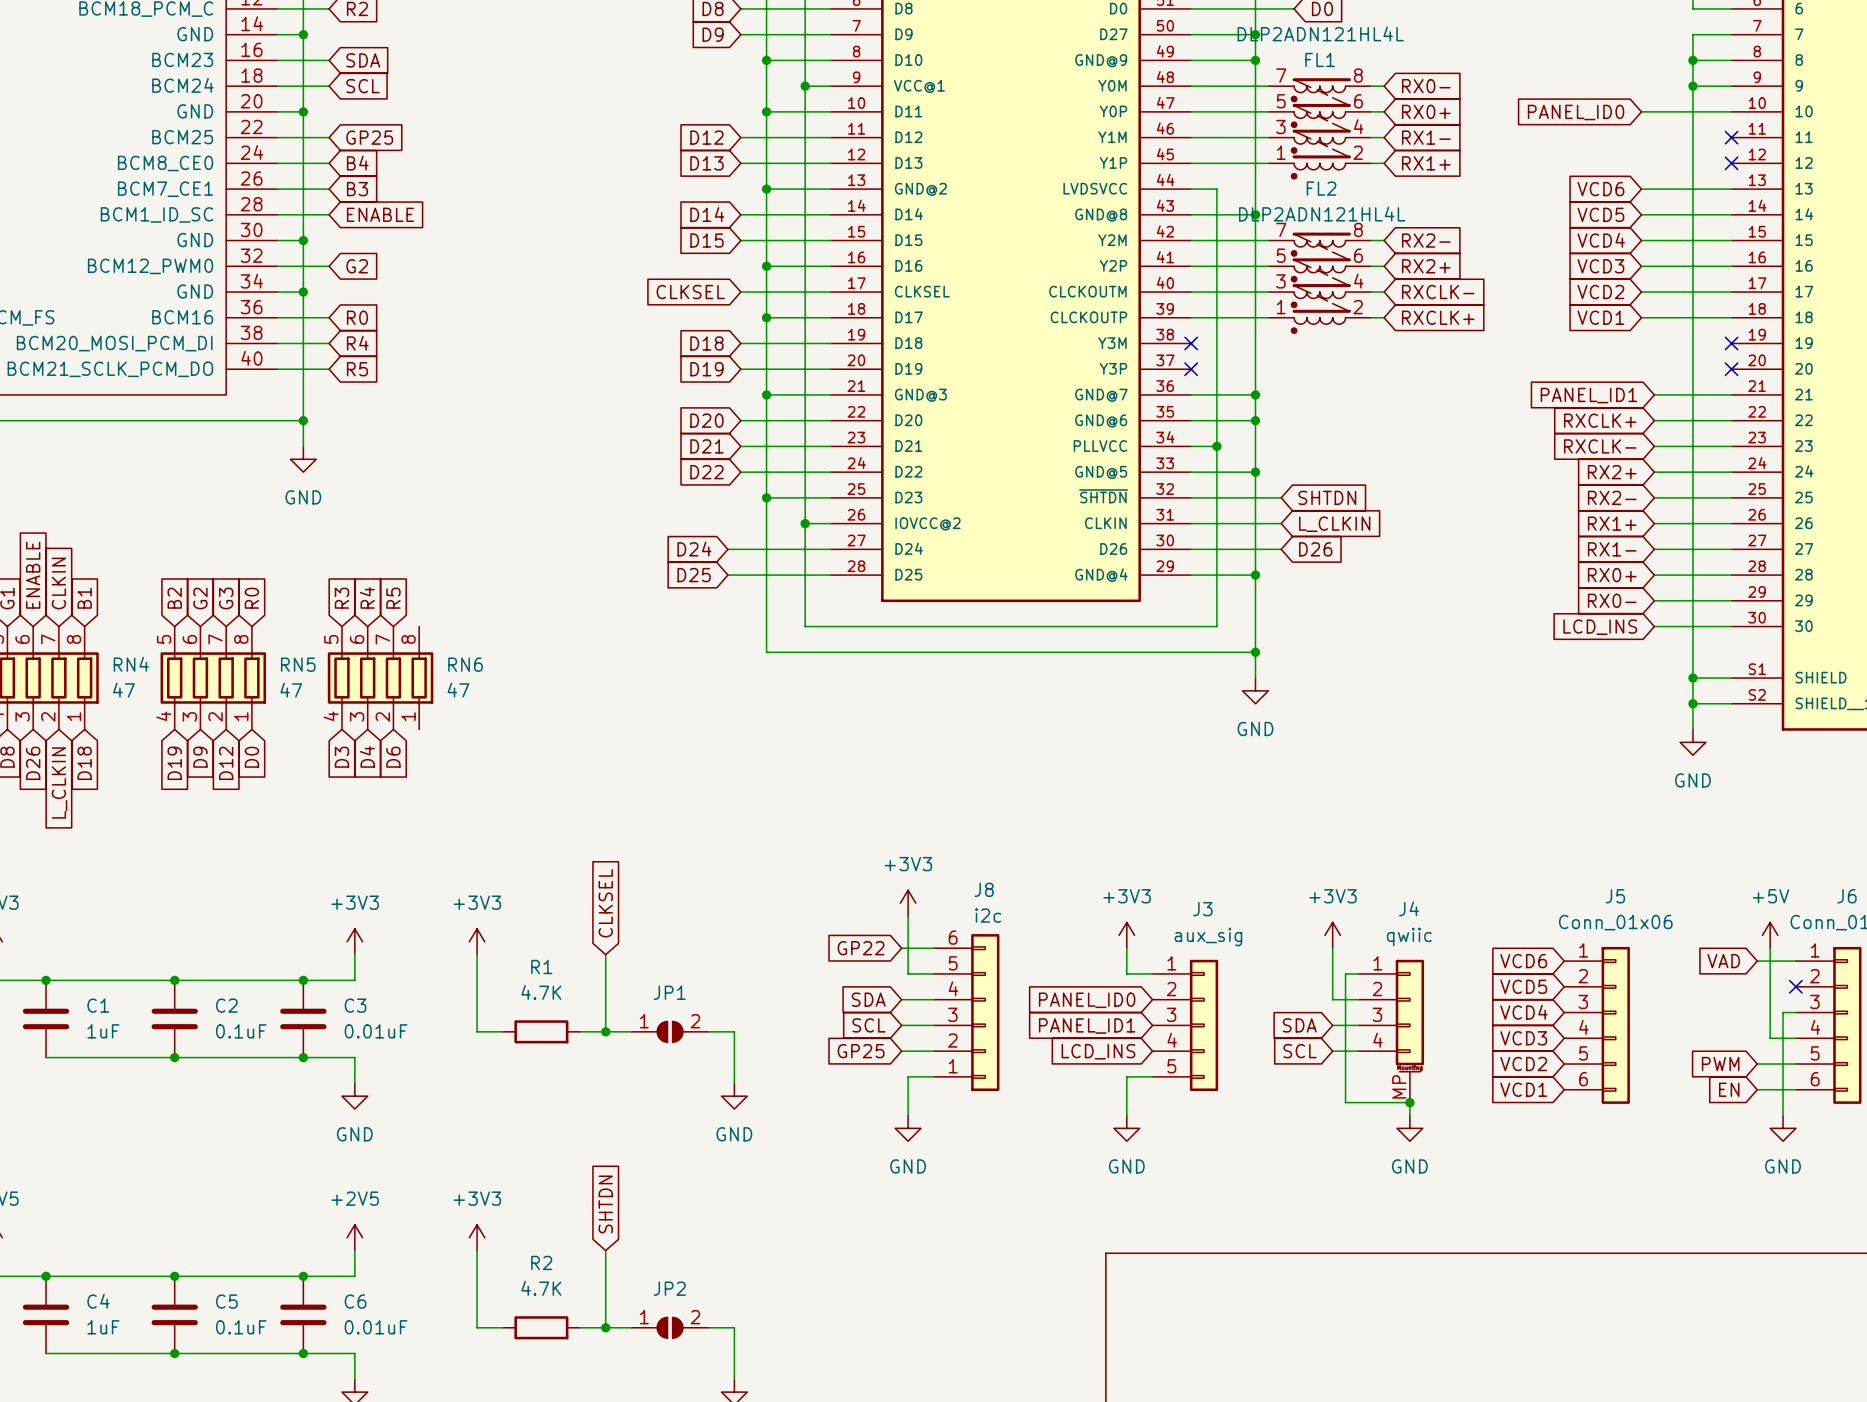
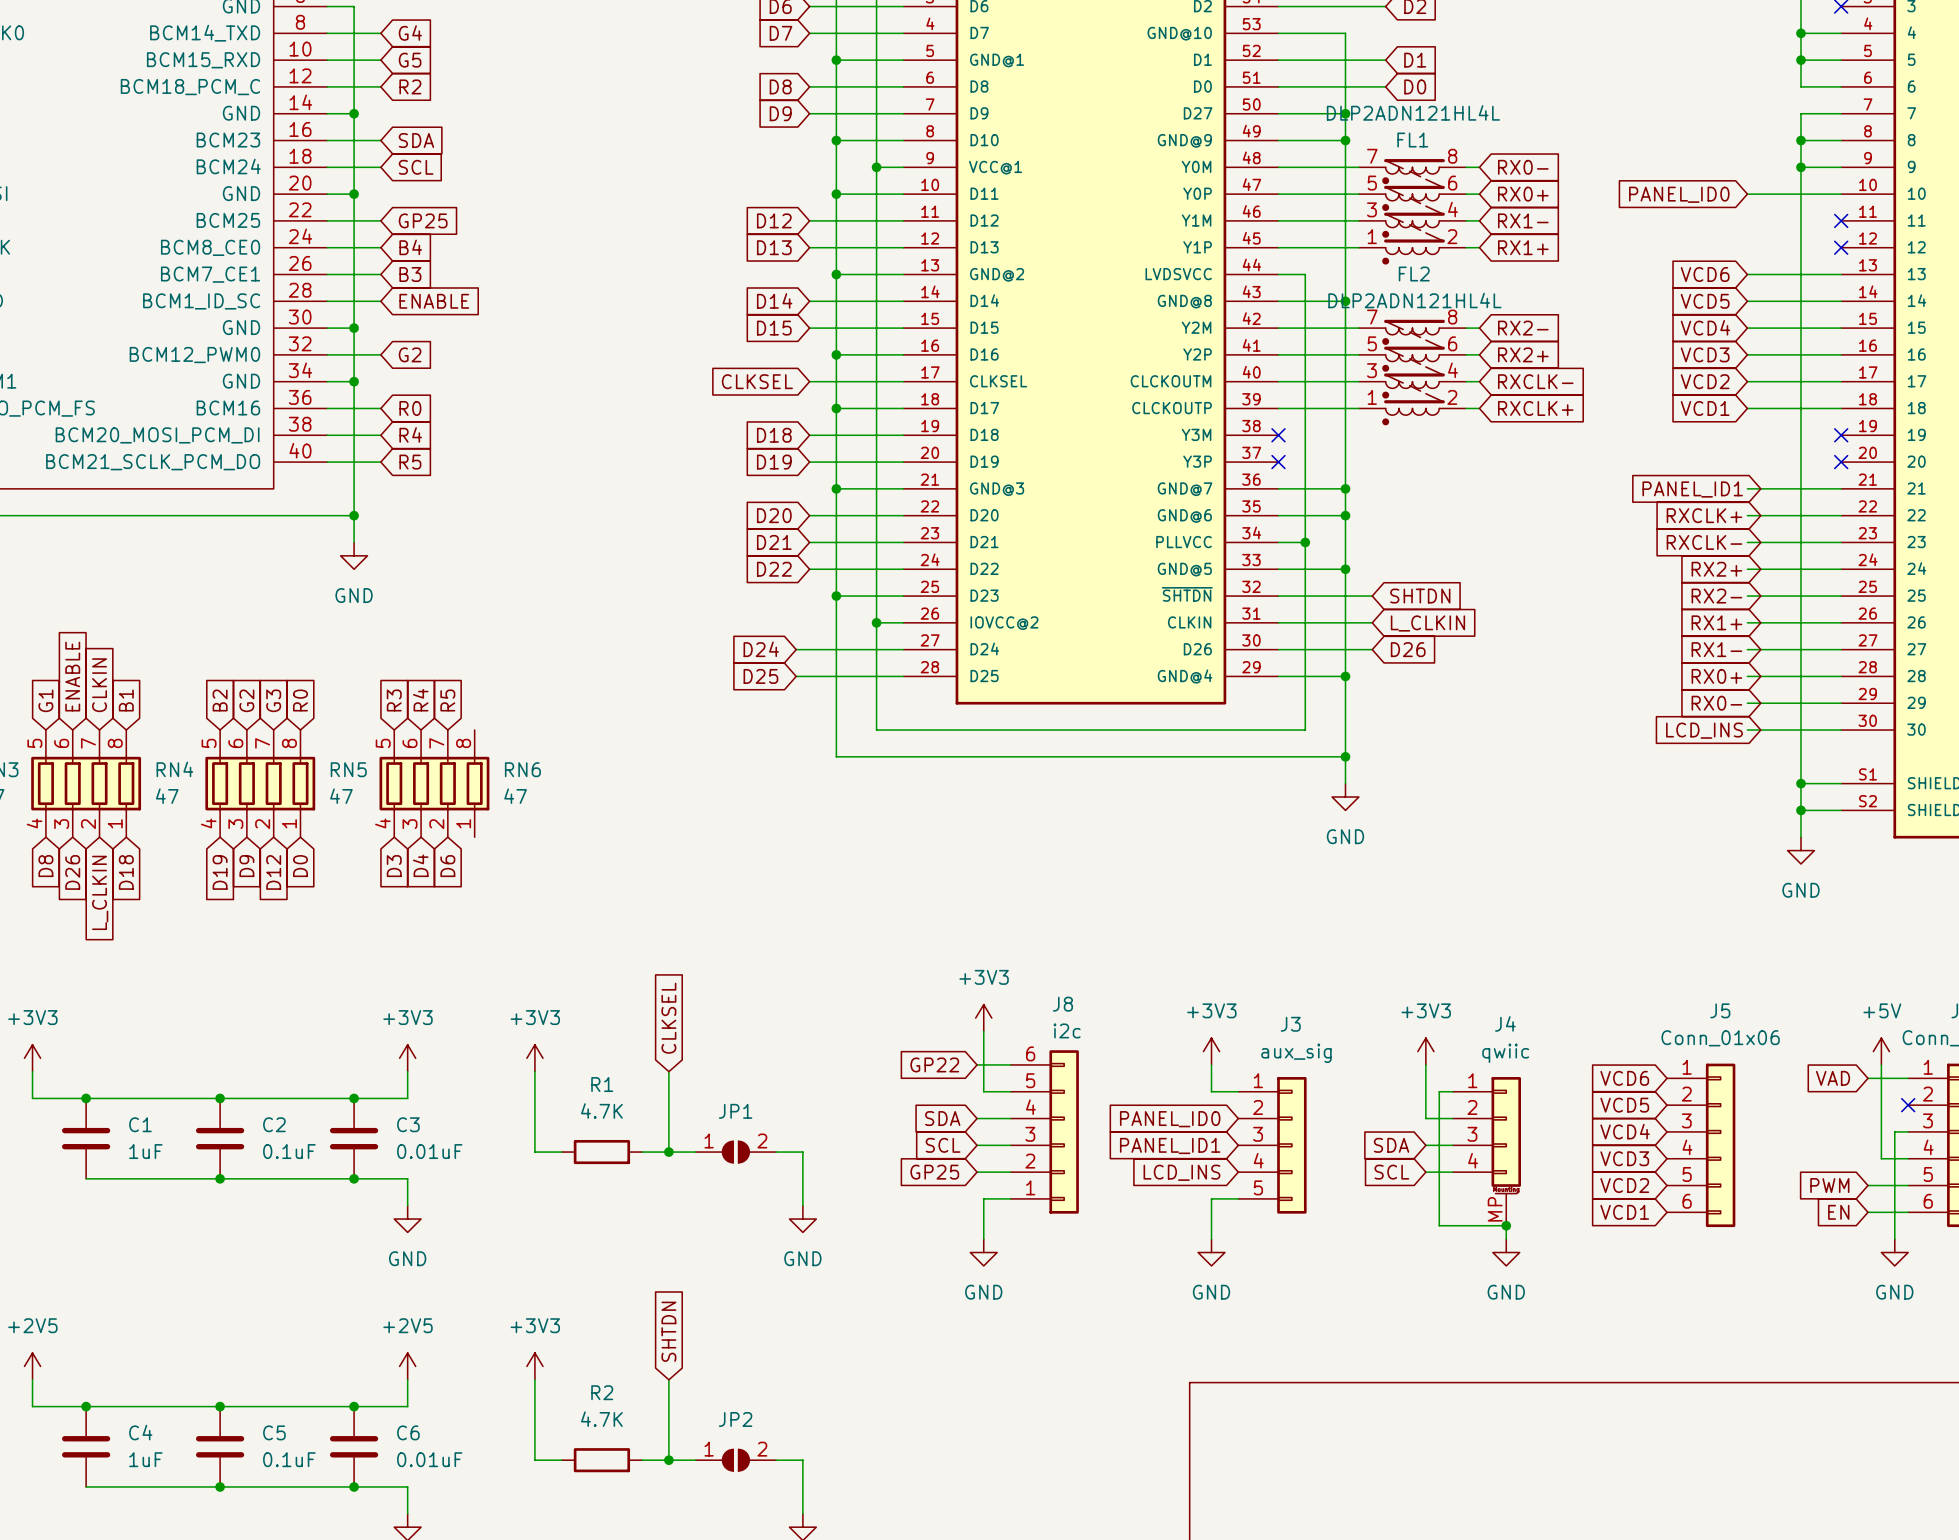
wire: none -> (1747, 488) (1760, 488)
wire: none -> (1747, 515) (1760, 515)
wire: none -> (1747, 542) (1760, 542)
wire: none -> (1747, 569) (1760, 569)
wire: none -> (1747, 596) (1760, 596)
wire: none -> (1747, 622) (1760, 622)
wire: none -> (1747, 649) (1760, 649)
wire: none -> (1747, 676) (1760, 676)
wire: none -> (1747, 703) (1760, 703)
wire: none -> (1747, 730) (1760, 730)

